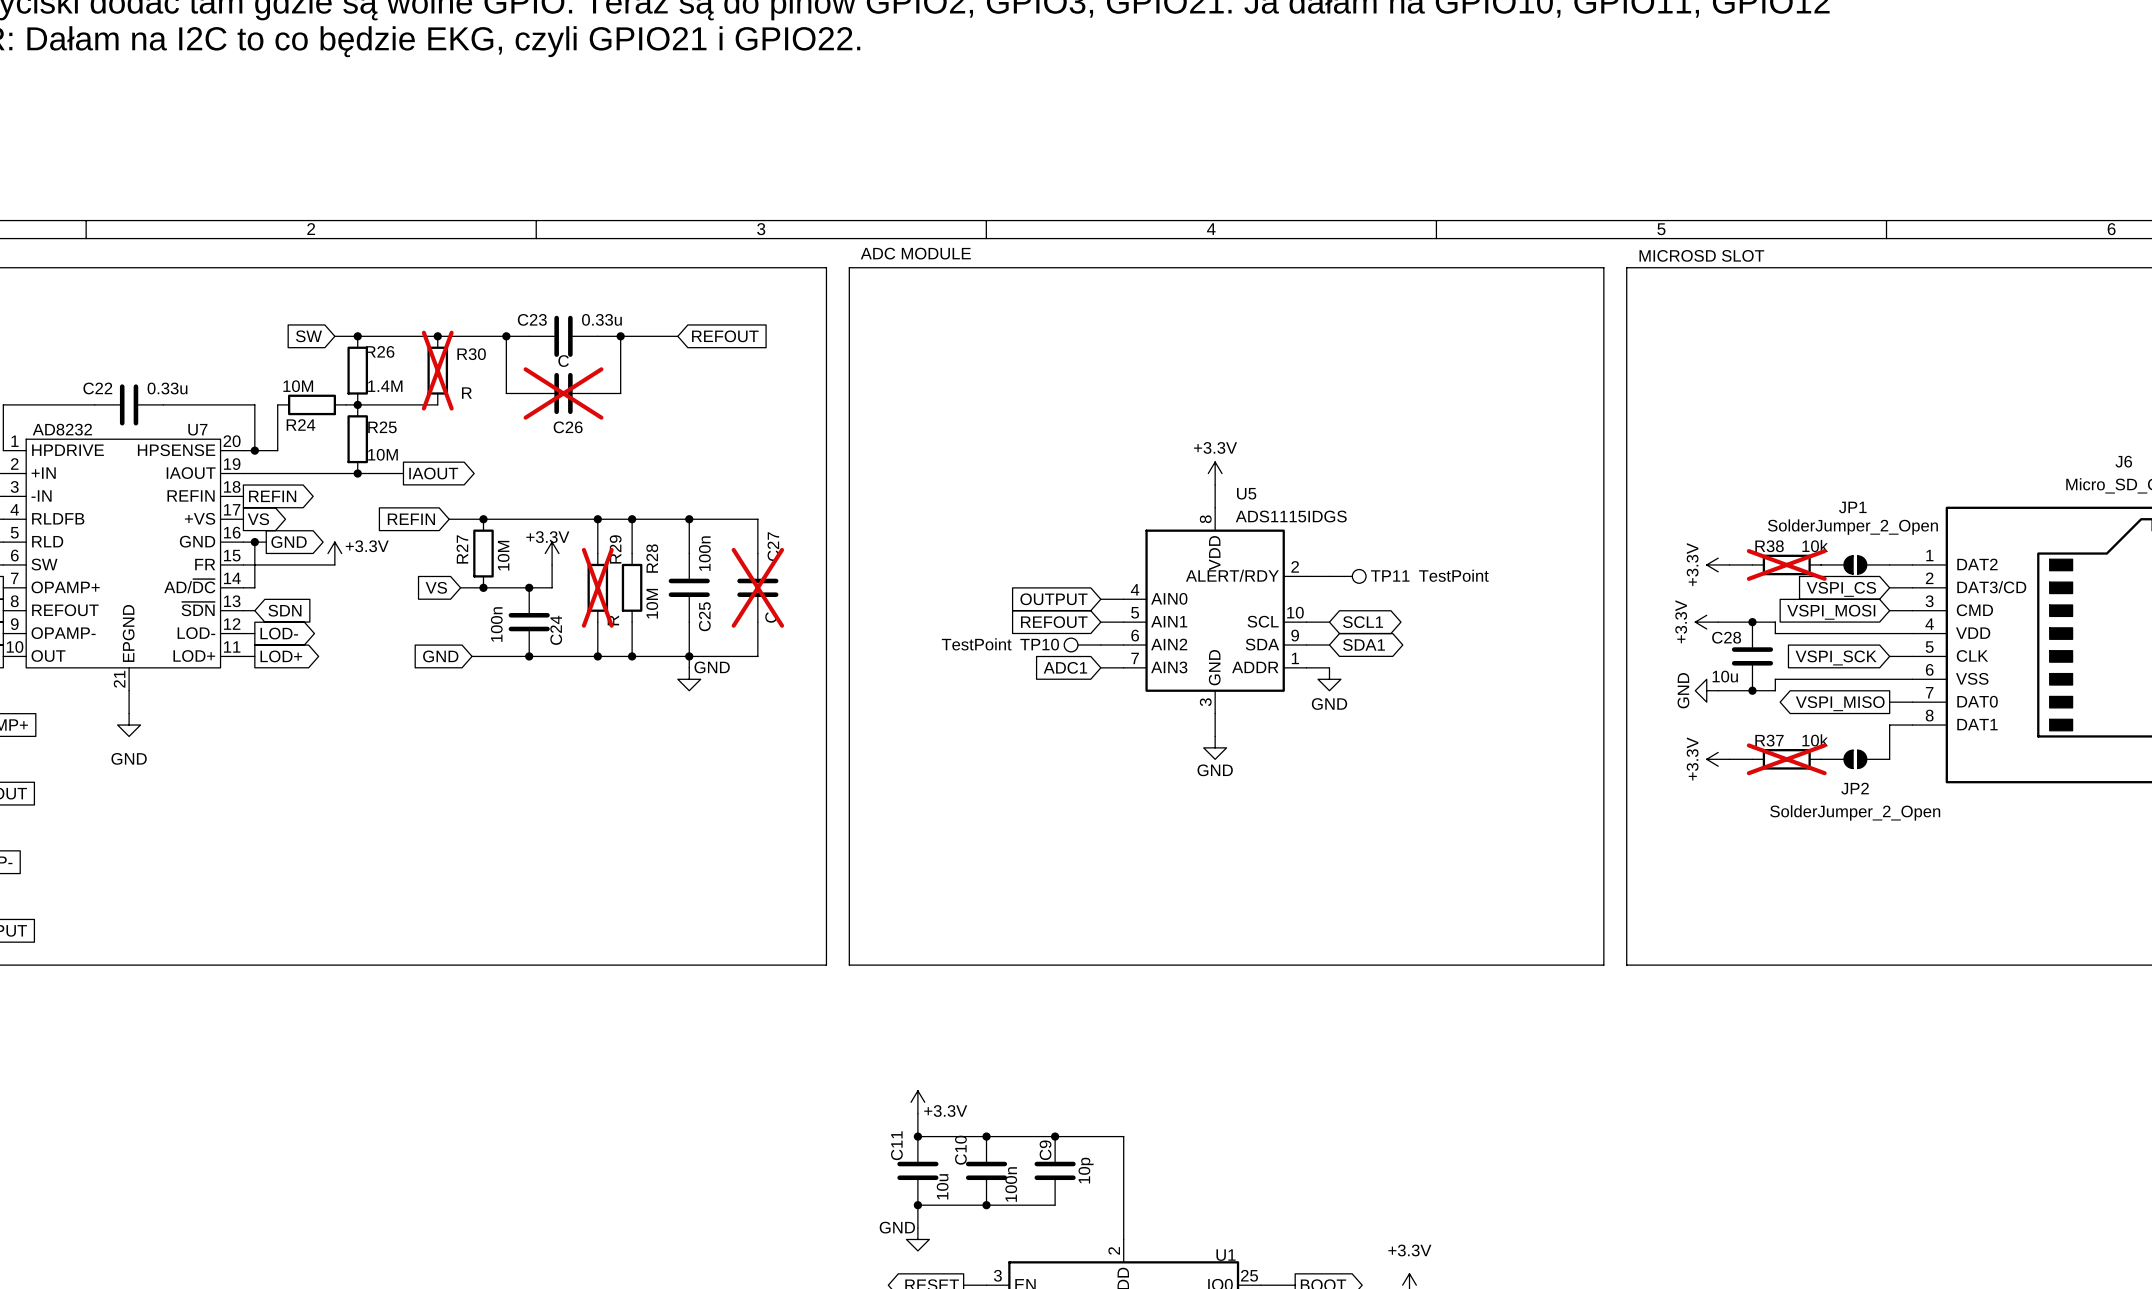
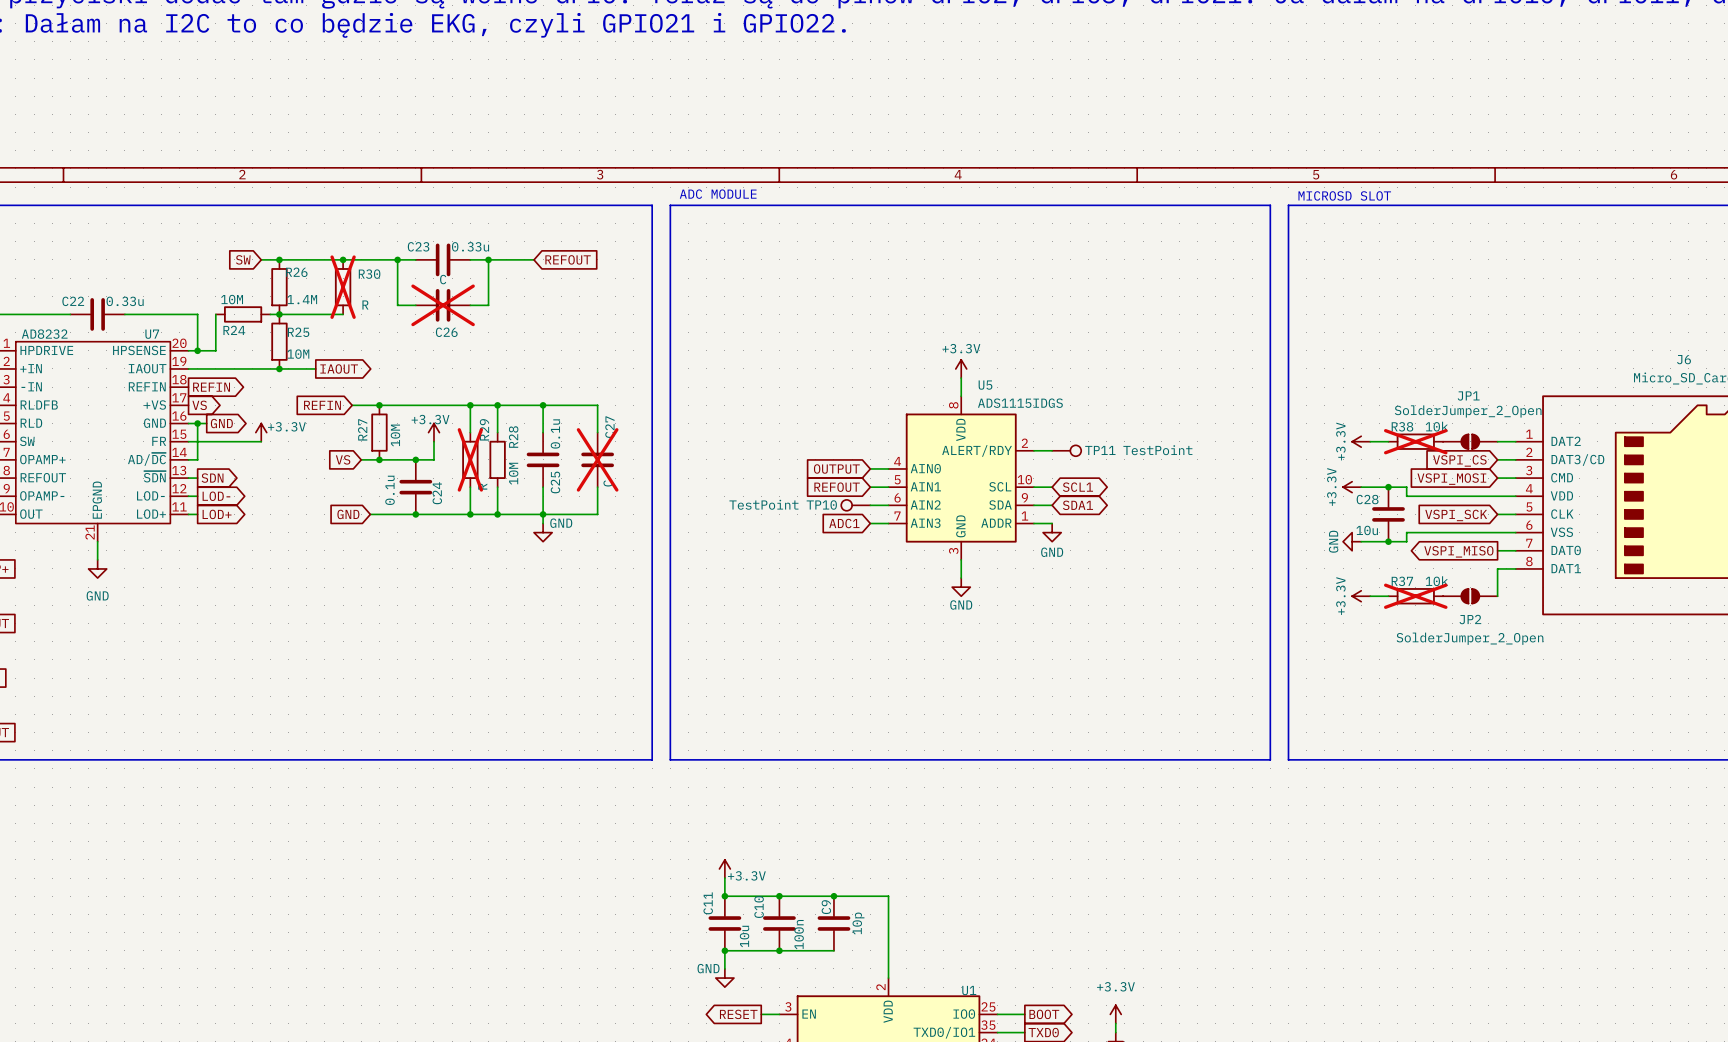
C25 value: 100n (704, 553) -> 0.1u (555, 433)
global label shape: input (284, 610) -> output (212, 478)
C24 value: 100n (496, 624) -> 0.1u (390, 490)

